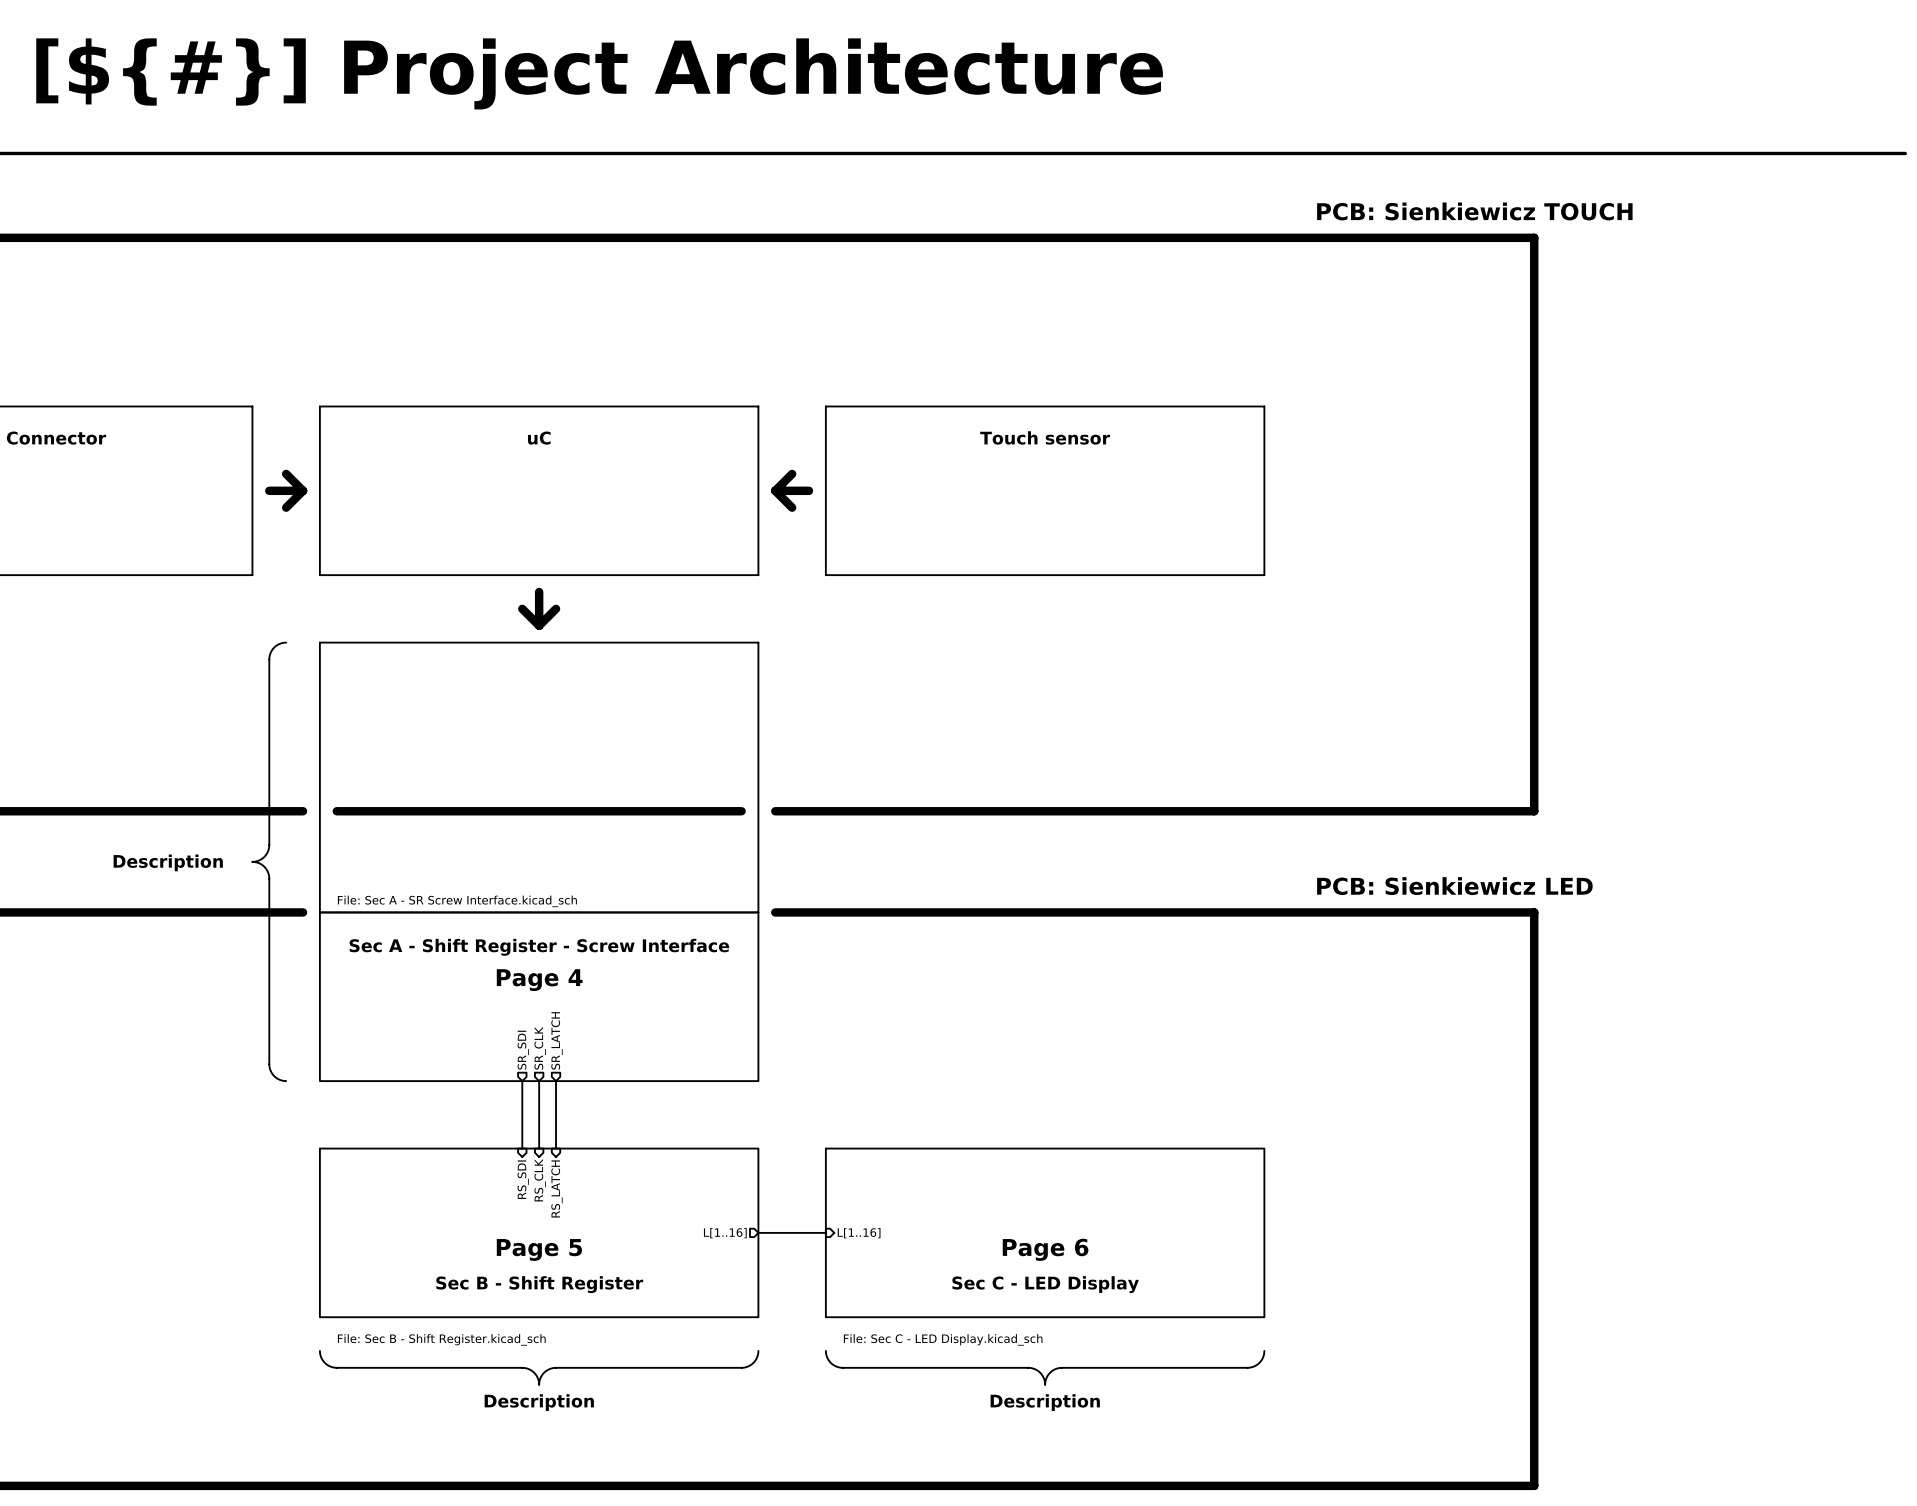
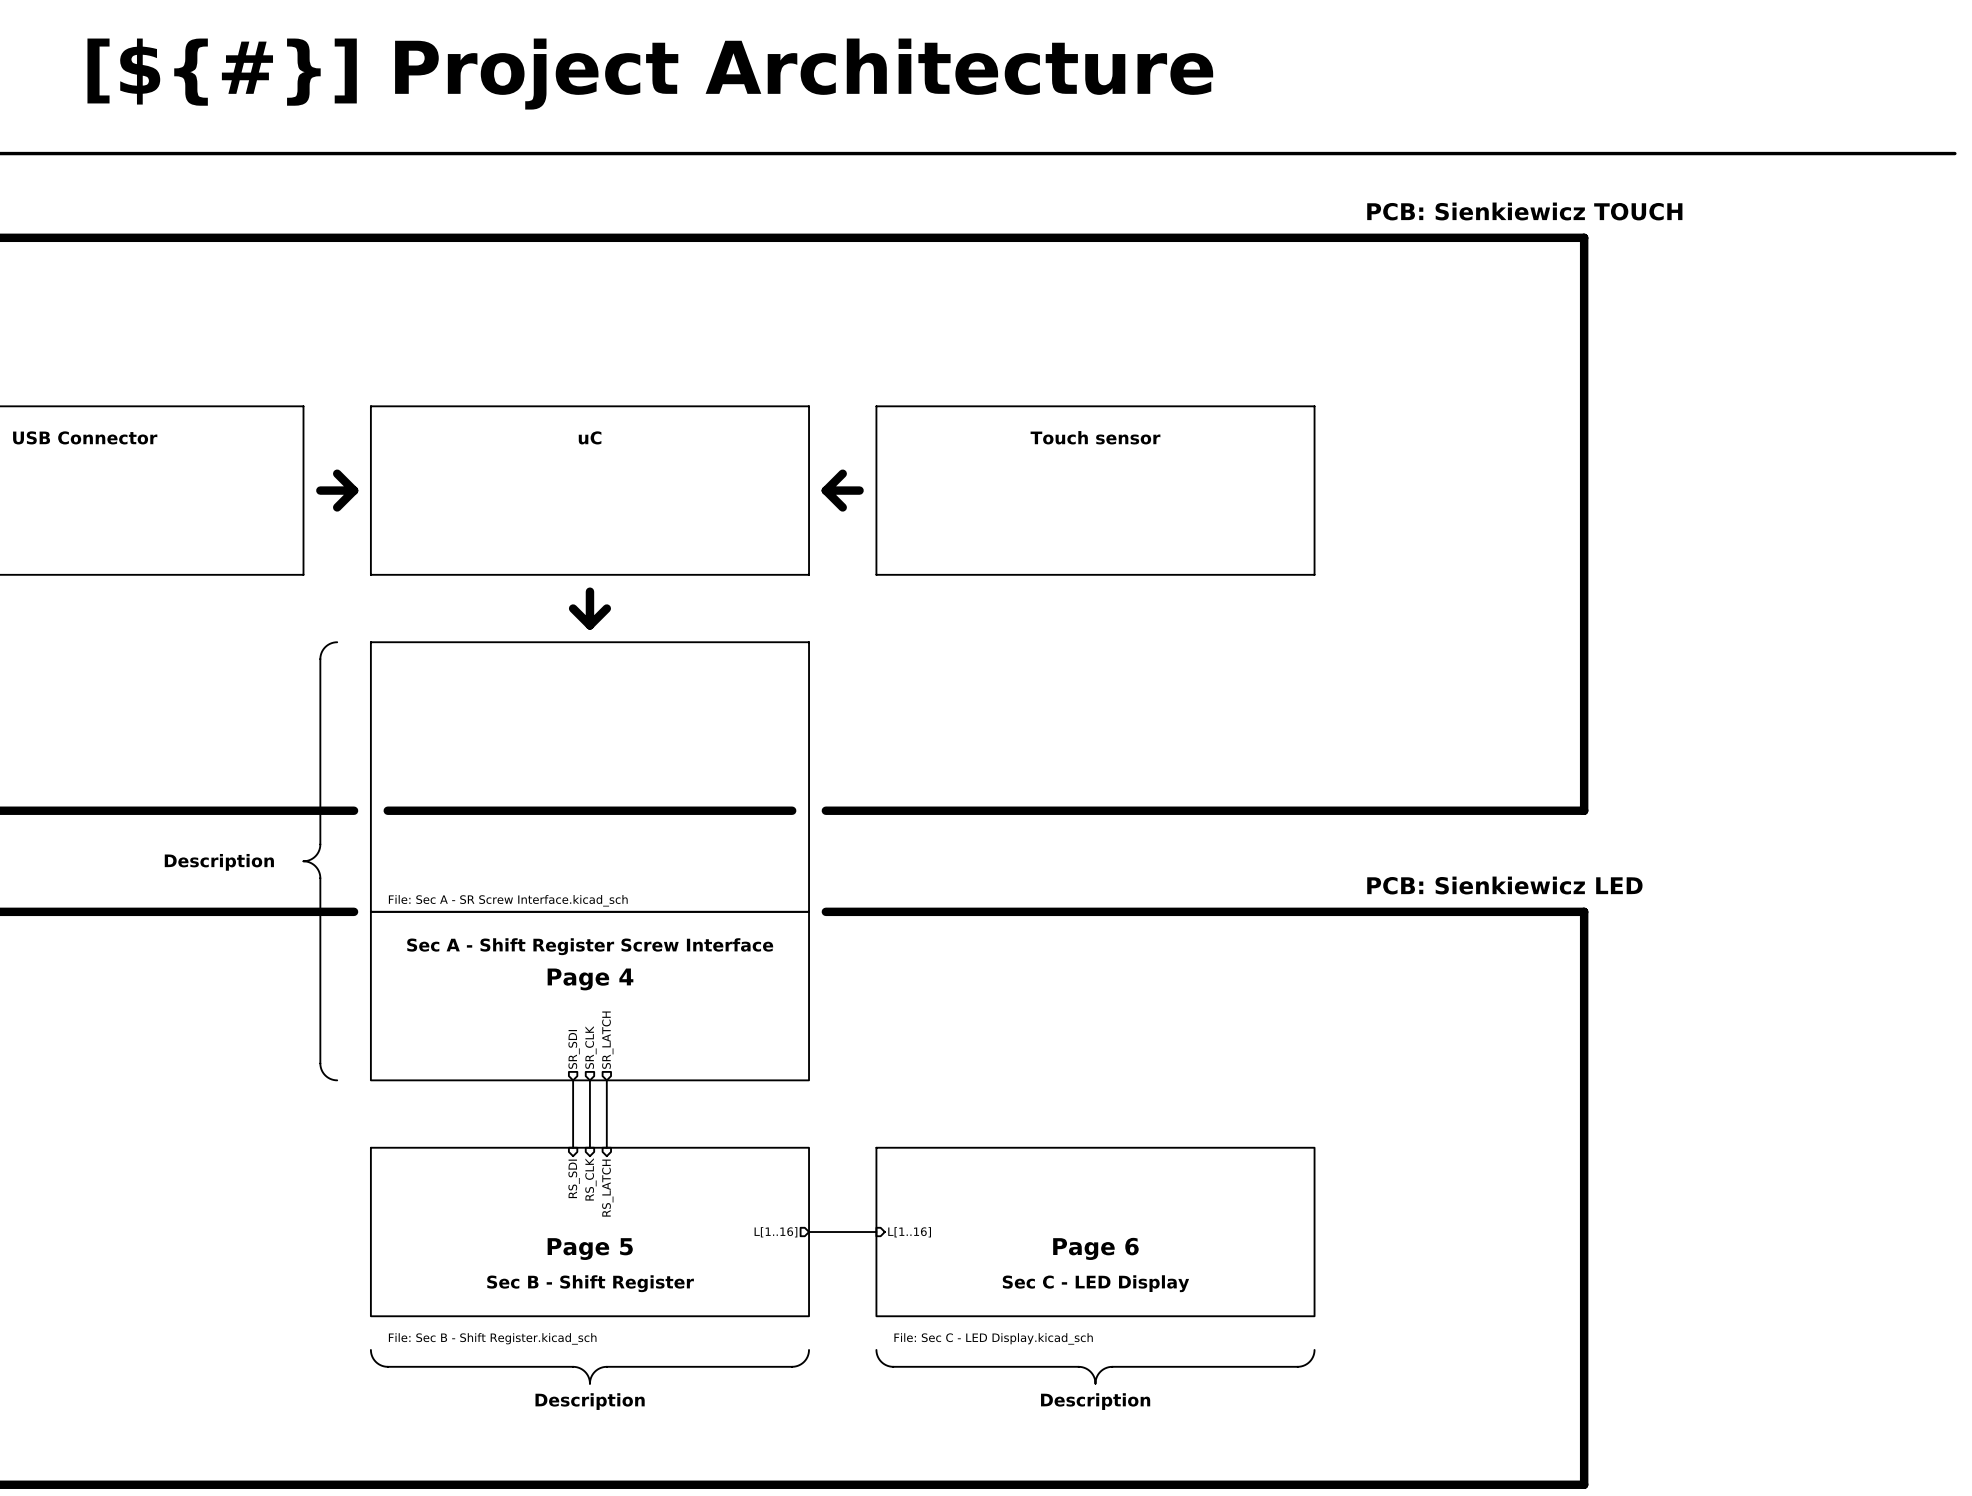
sheet Sec A - Shift Register - Screw Interface name: Sec A - Shift Register - Screw Interface (539, 947) -> Sec A - Shift Register Screw Interface (590, 946)

